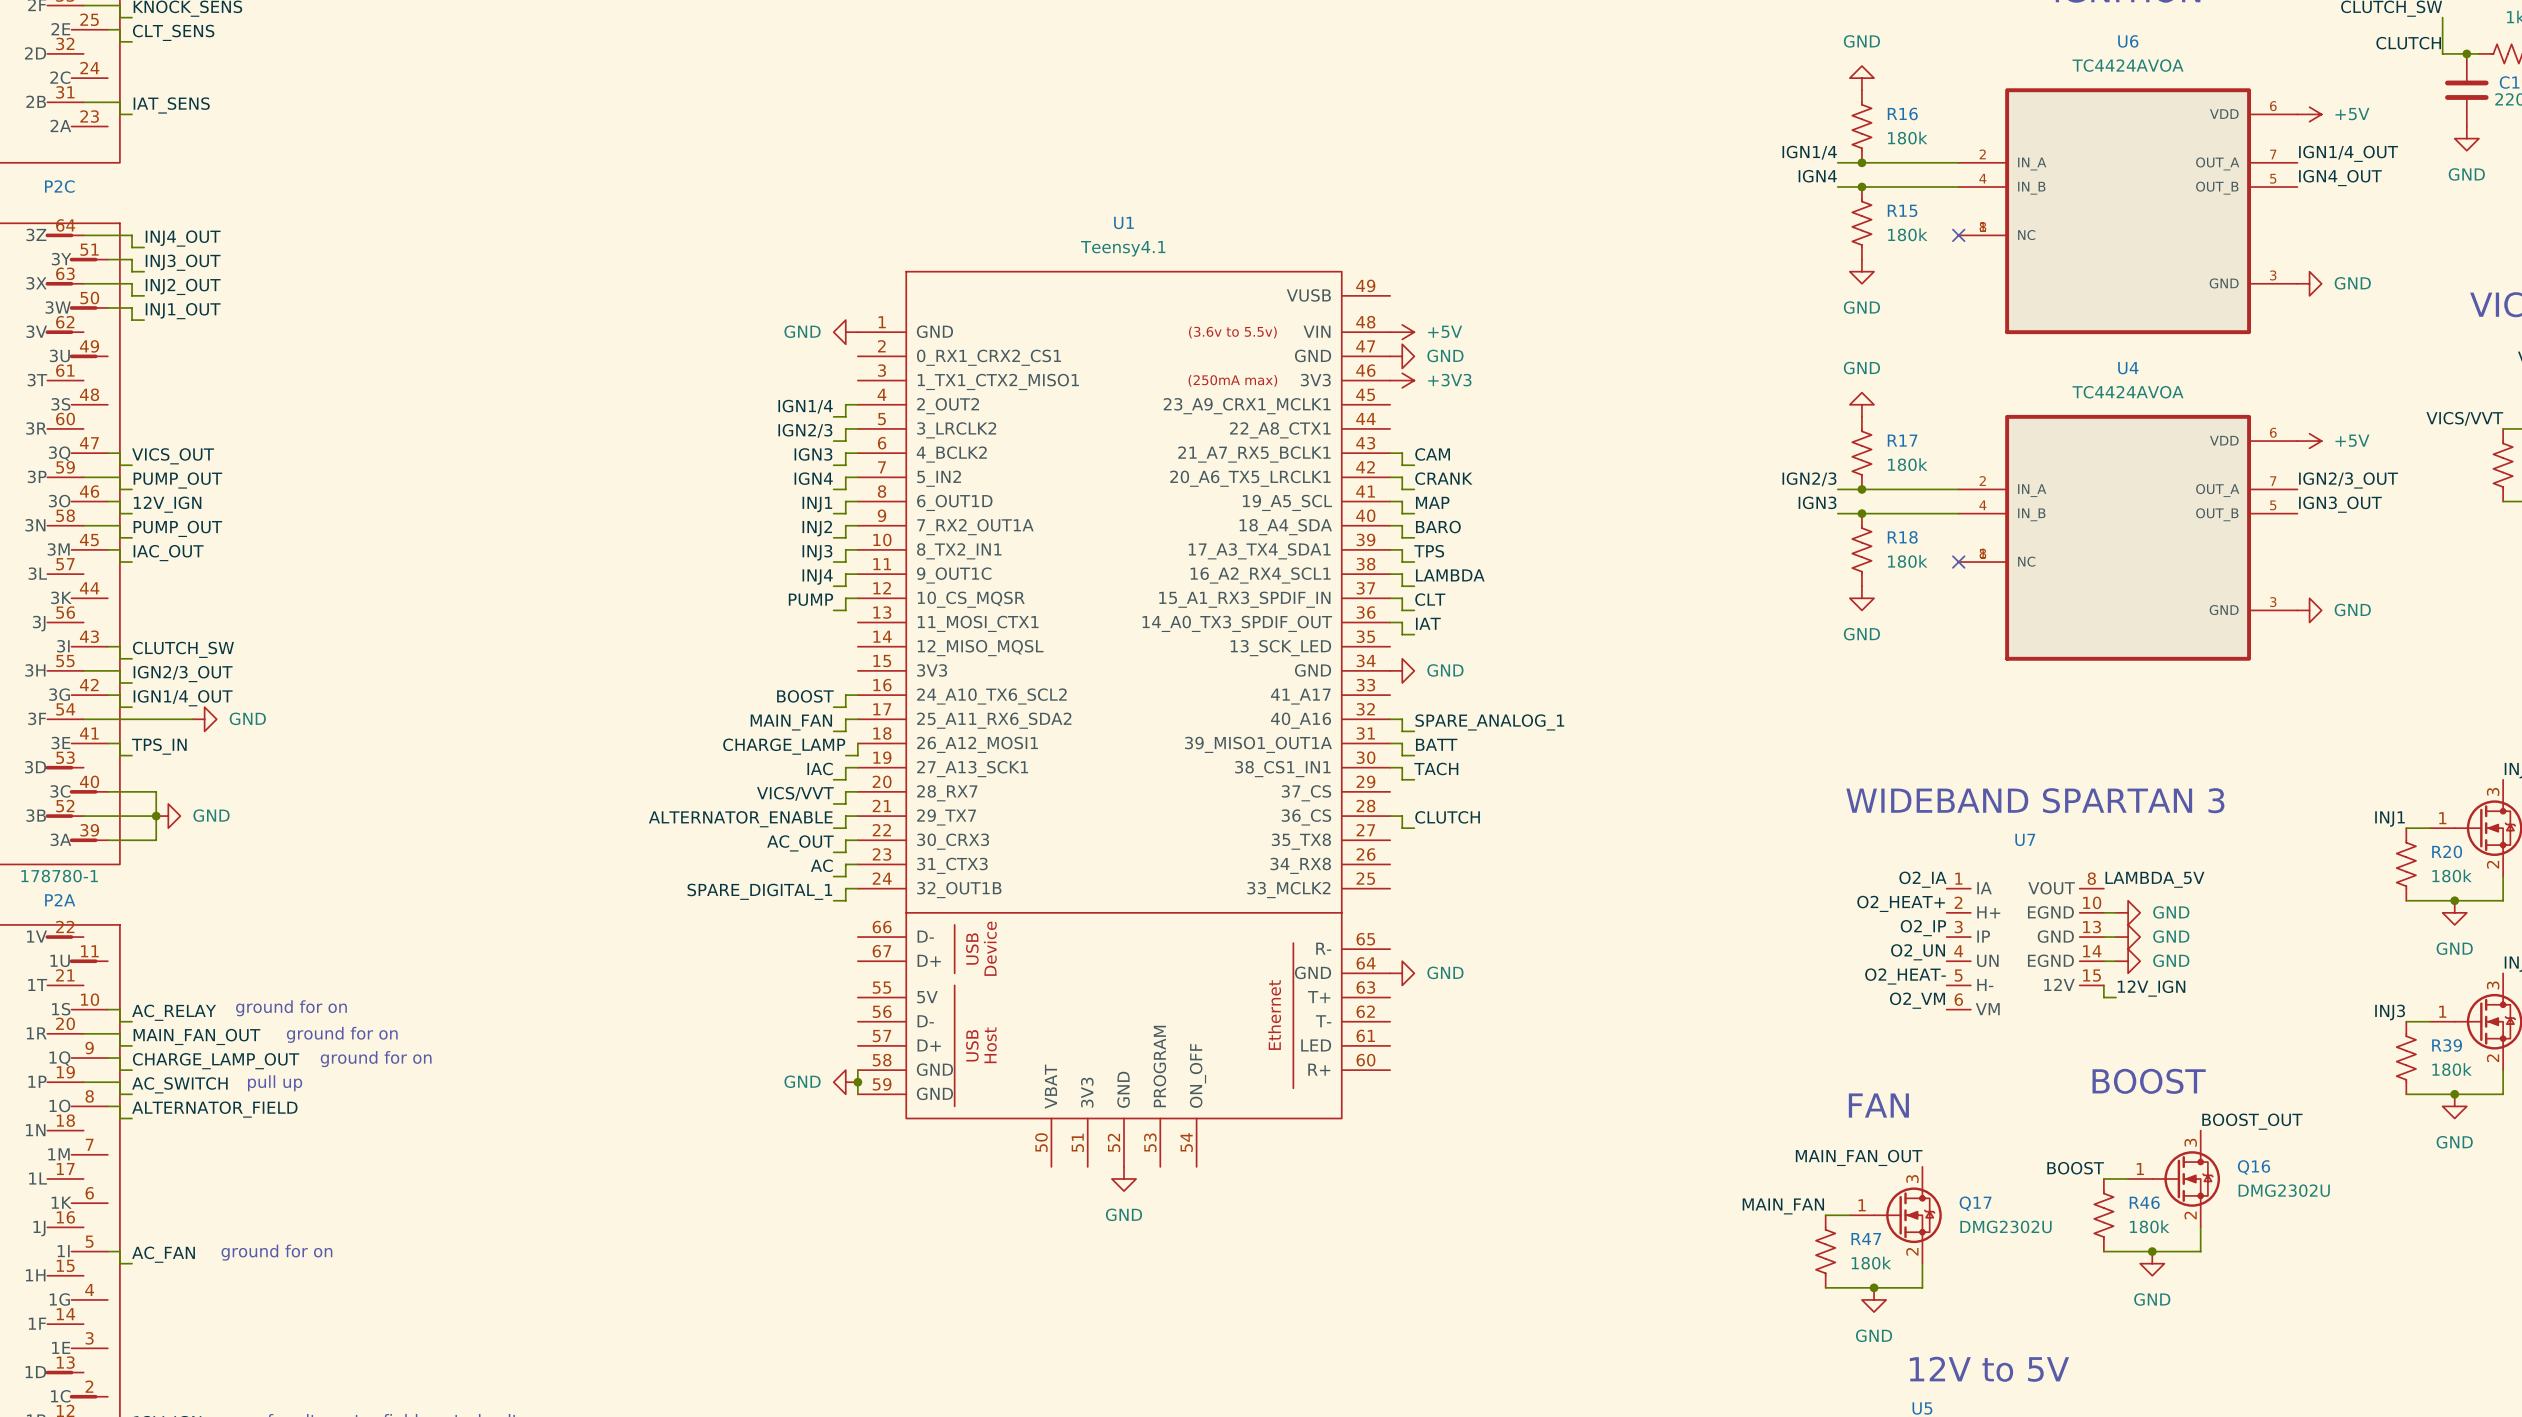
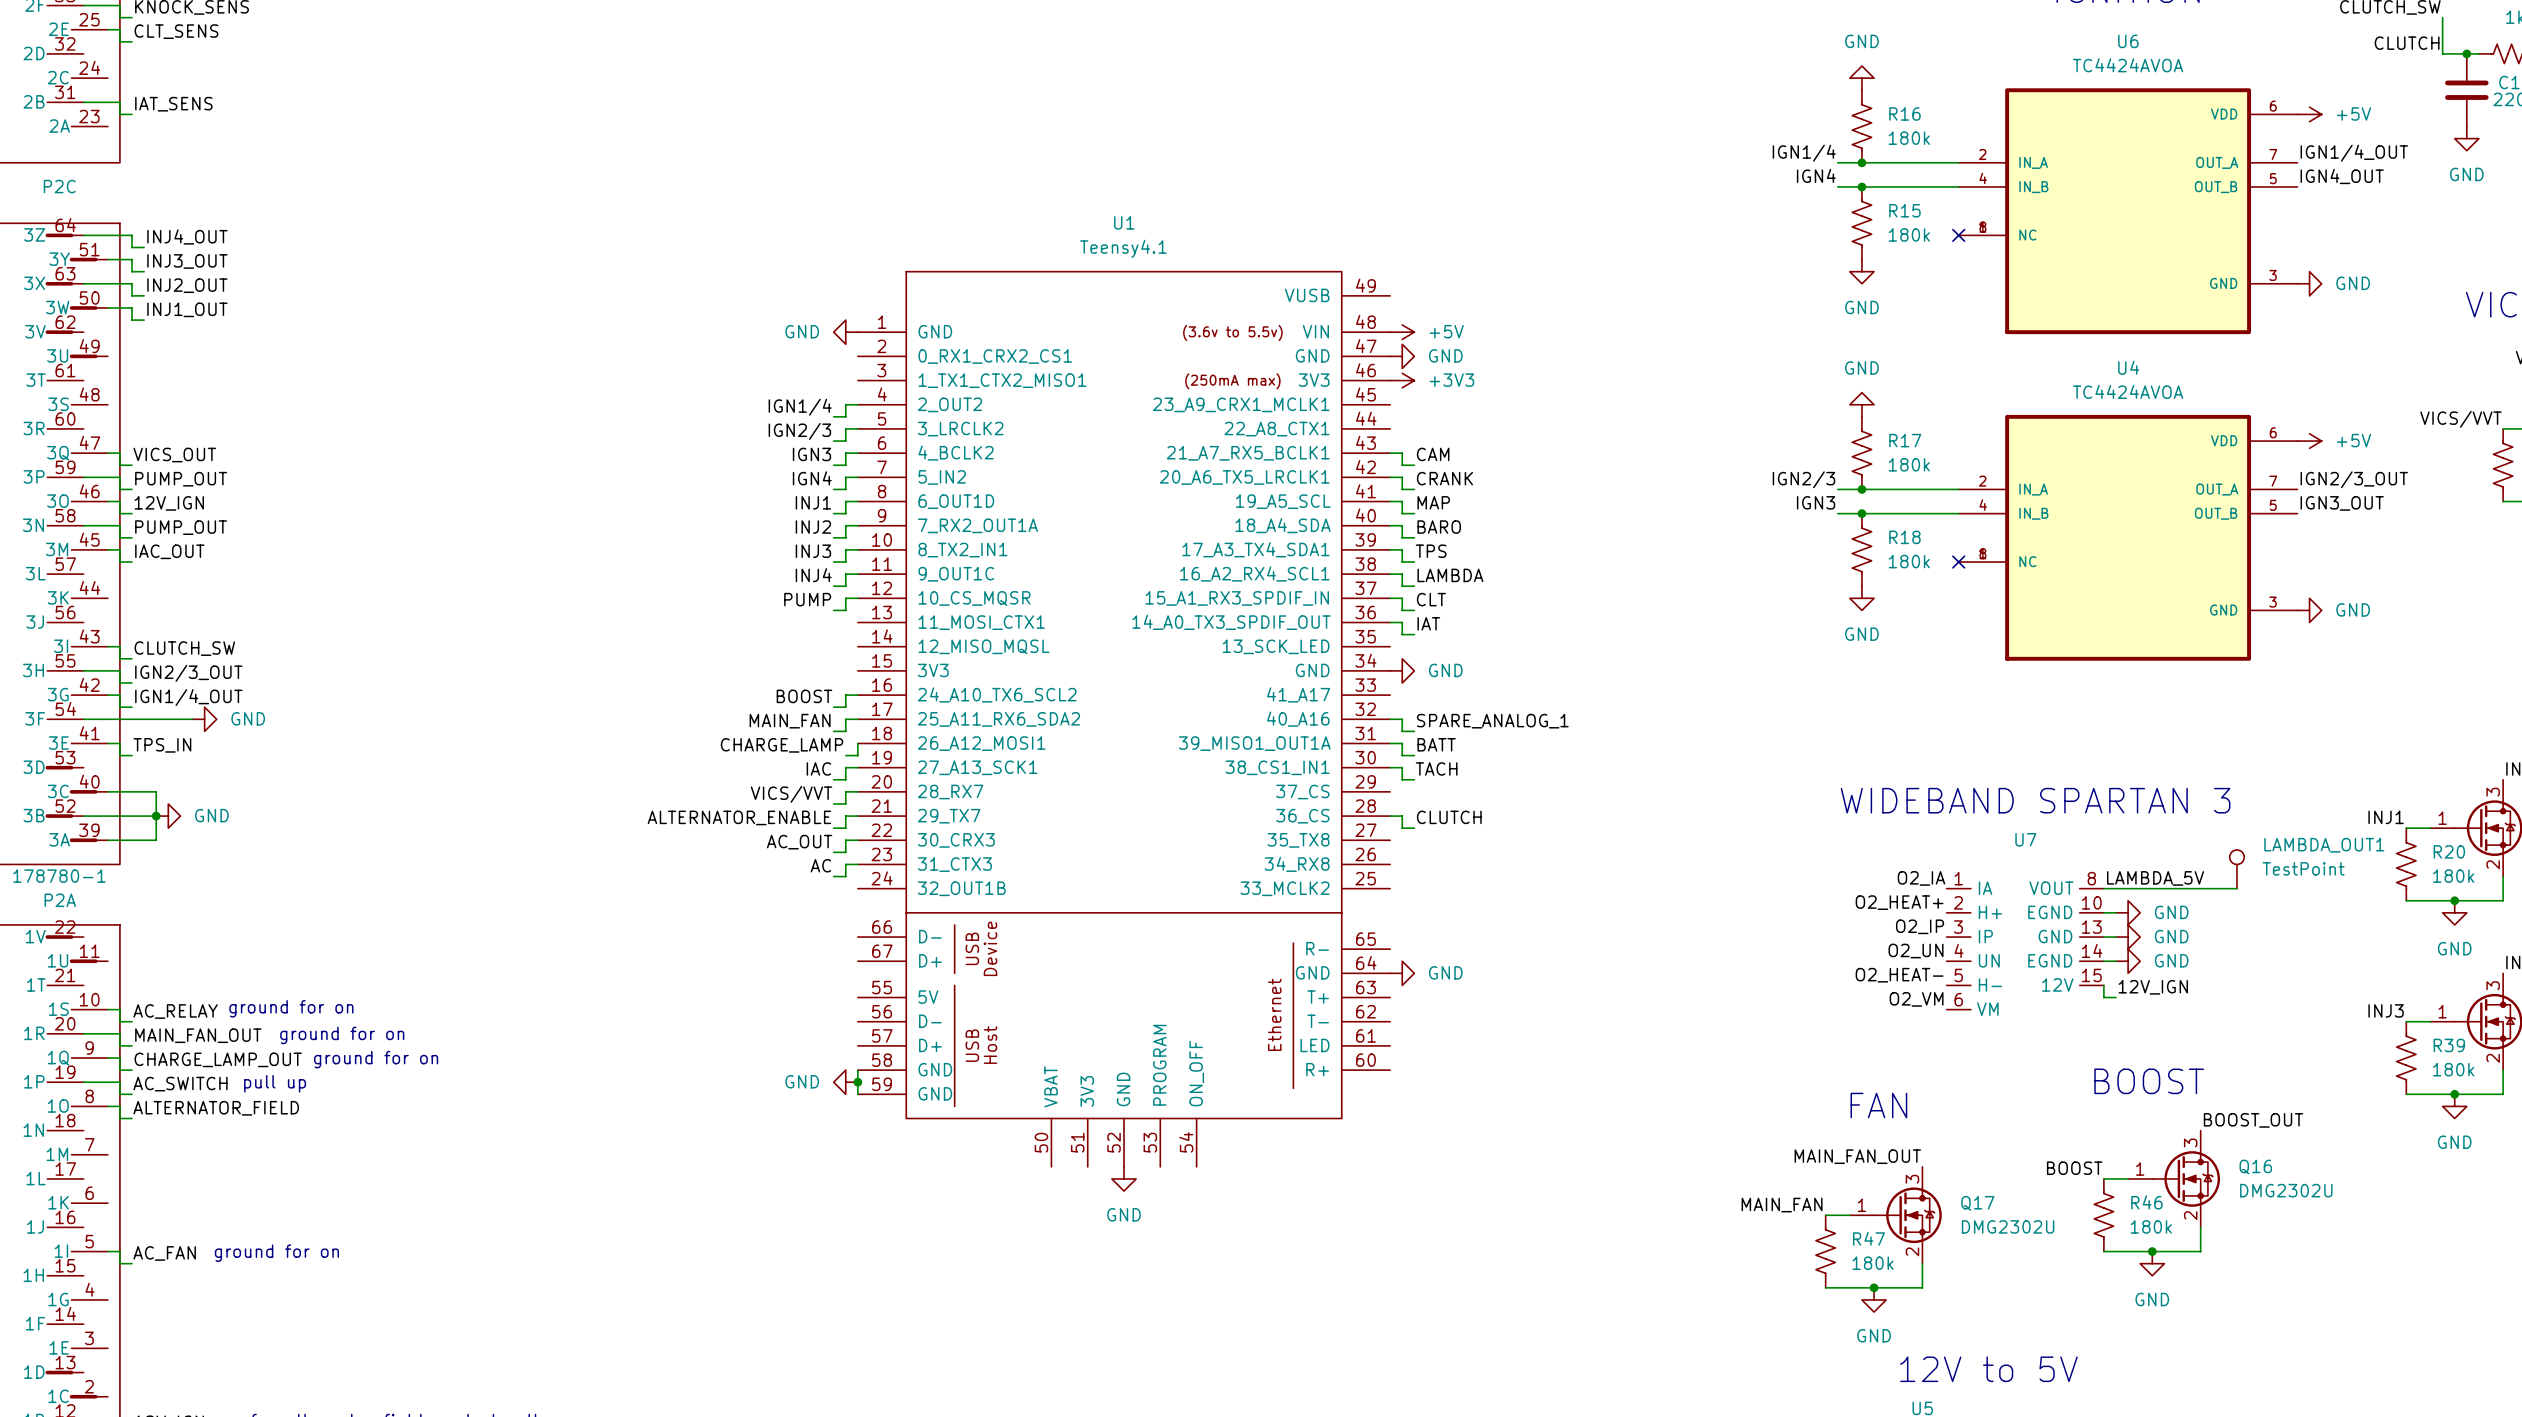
LAMBDA_OUT1: none -> TestPoint (2236, 869)
wire: (857, 888) (845, 888) (845, 900) (833, 900) -> none
wire: none -> (2103, 888) (2236, 888)
label: SPARE_DIGITAL_1 (759, 891) -> none

